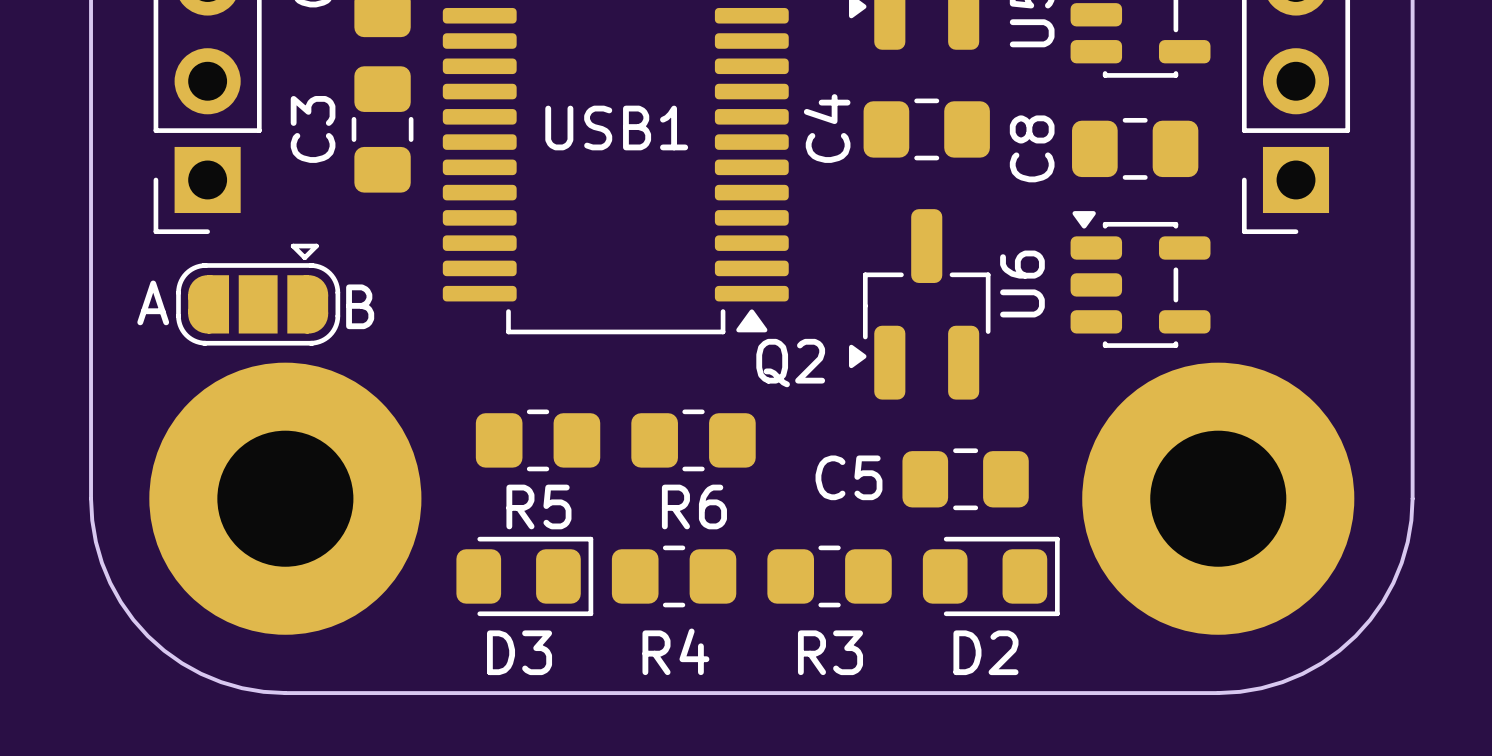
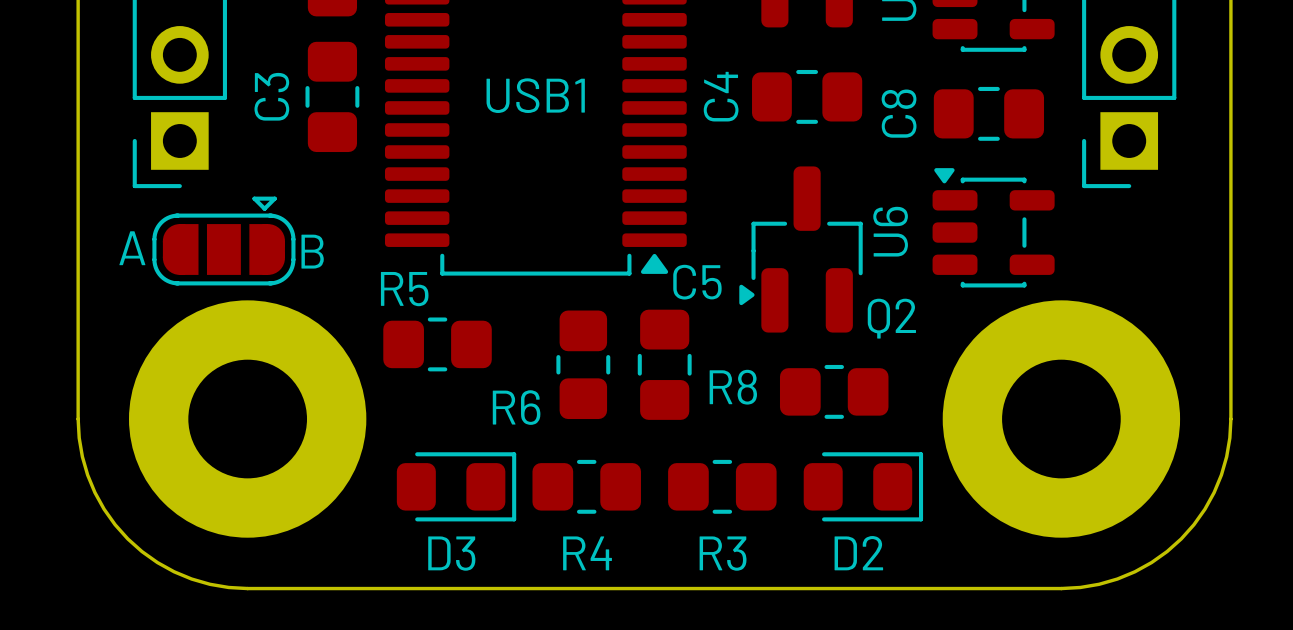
Q2 name position: Q2 (790, 363) -> Q2 (891, 318)
R5 position: (538, 440) -> (437, 344)
R6 rotation: 0° (693, 440) -> 90° clockwise (583, 364)
R8: none -> (834, 391)
C5 rotation: 0° (965, 479) -> 90° clockwise (664, 364)
C5 position: (965, 479) -> (664, 364)
R5 name position: R5 (538, 506) -> R5 (404, 289)

